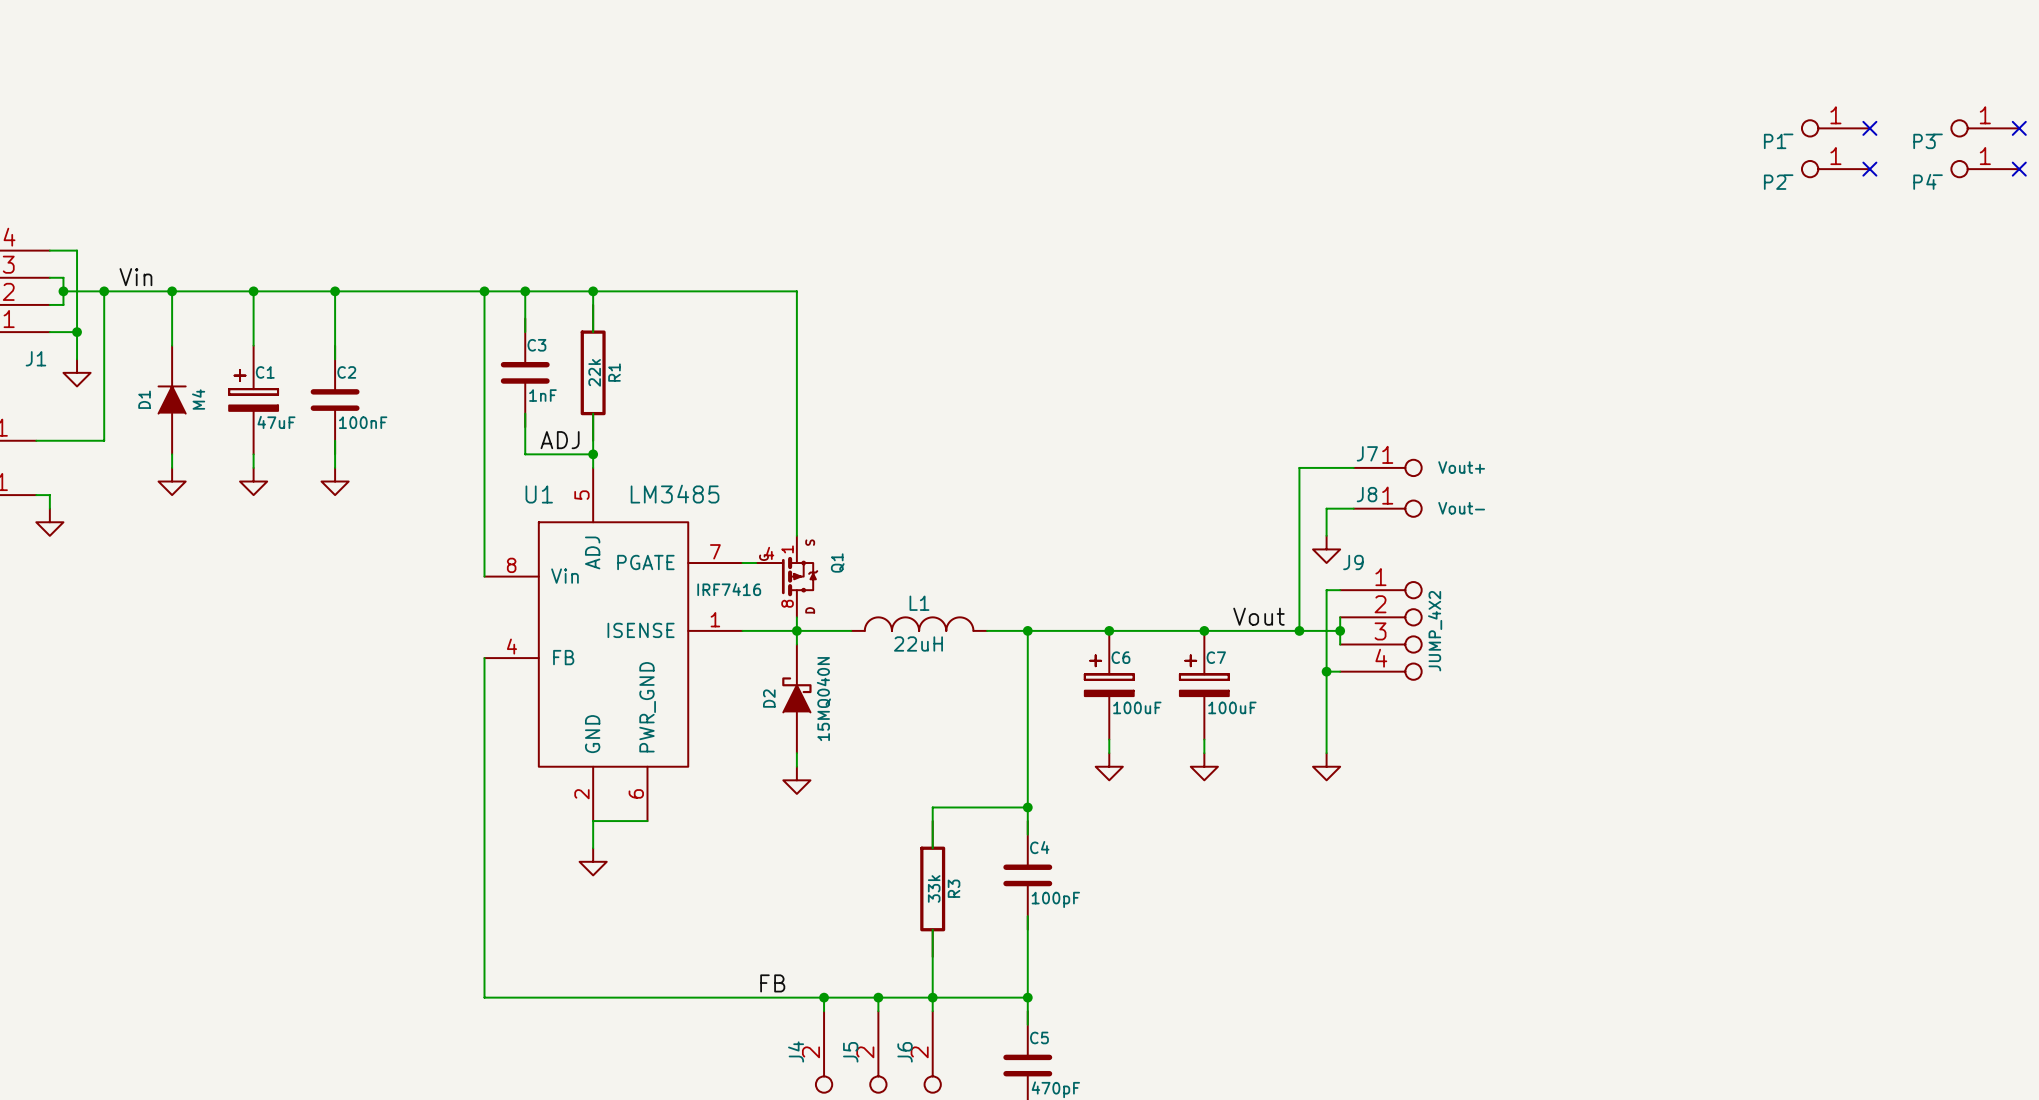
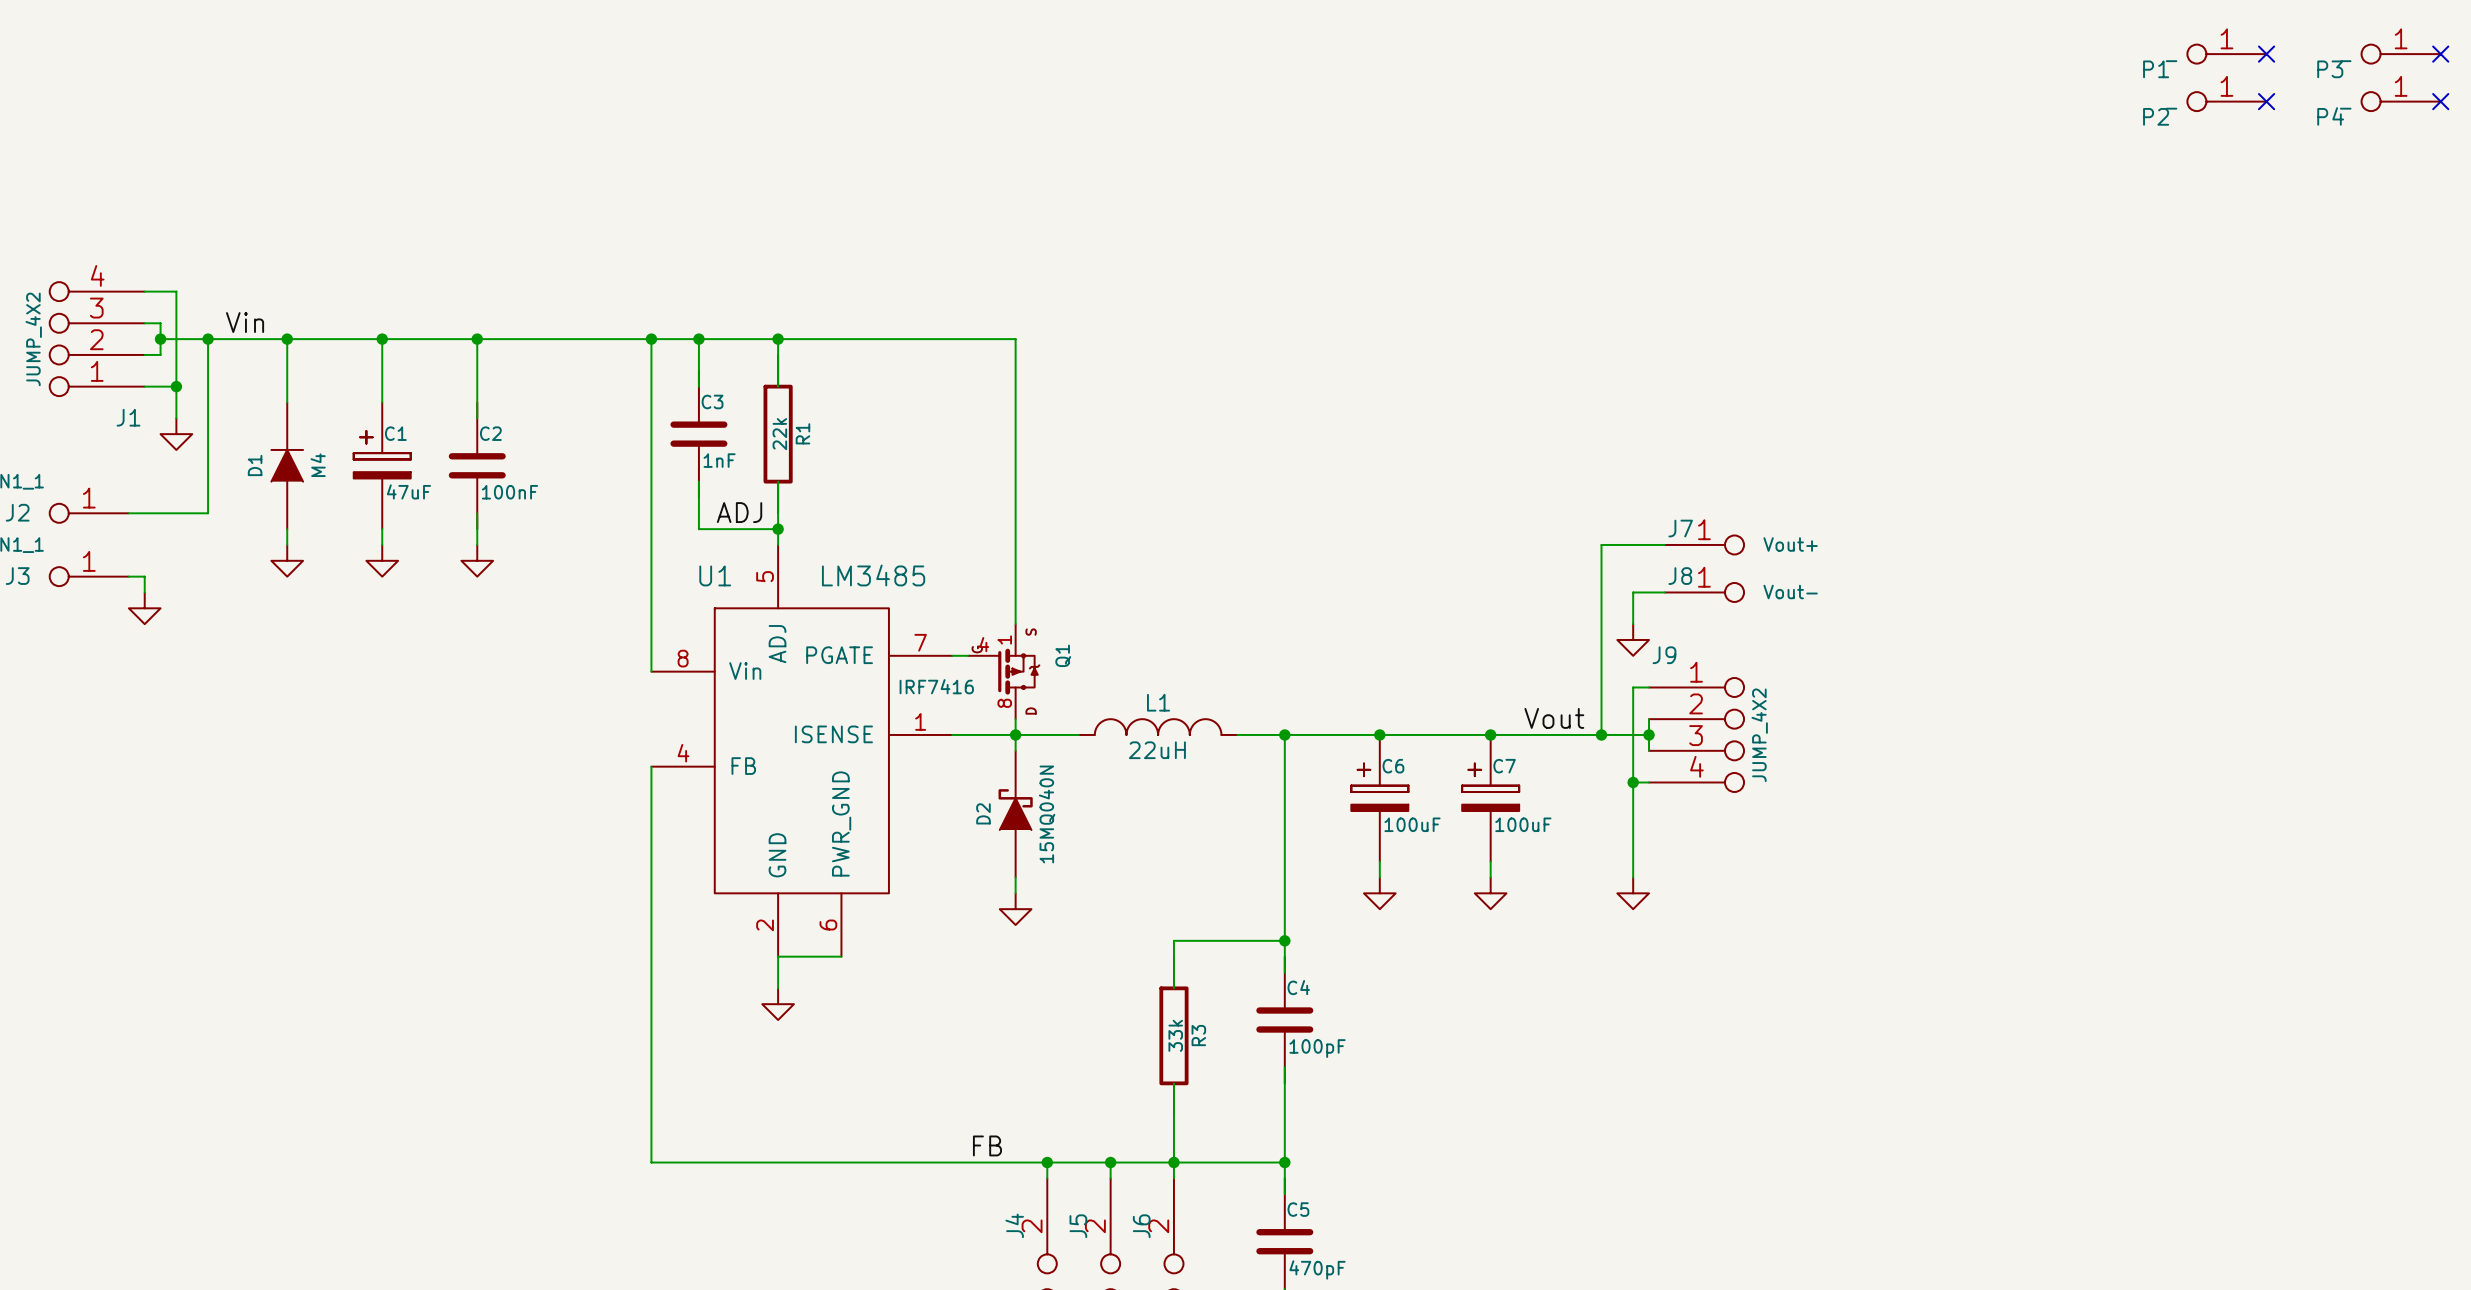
no-connect mark: none -> (2266, 54)
no-connect mark: none -> (2440, 54)
no-connect mark: none -> (2266, 101)
no-connect mark: none -> (2440, 101)
P1 position: (1835, 128) -> (2226, 54)
no-connect mark: (1869, 128) -> none
P3 position: (1985, 128) -> (2401, 54)
no-connect mark: (2019, 128) -> none
P2 position: (1835, 169) -> (2226, 101)
no-connect mark: (1869, 169) -> none
P4 position: (1985, 169) -> (2401, 101)
no-connect mark: (2019, 169) -> none

